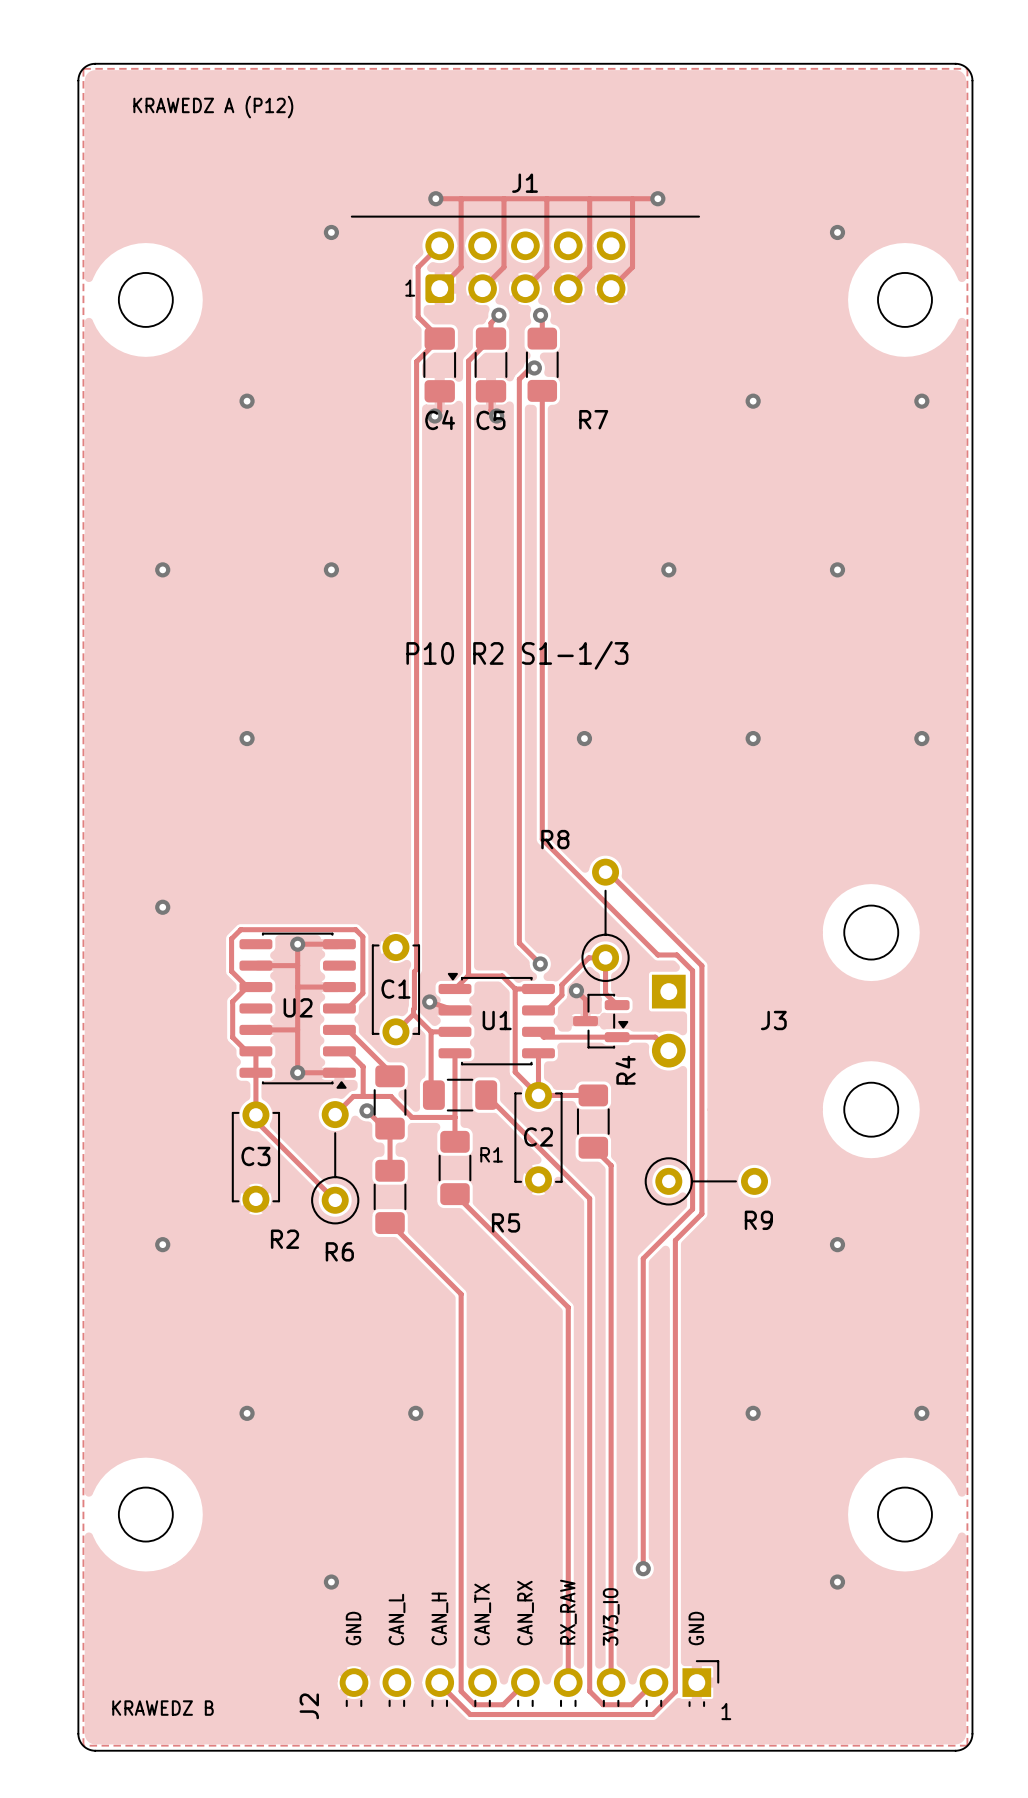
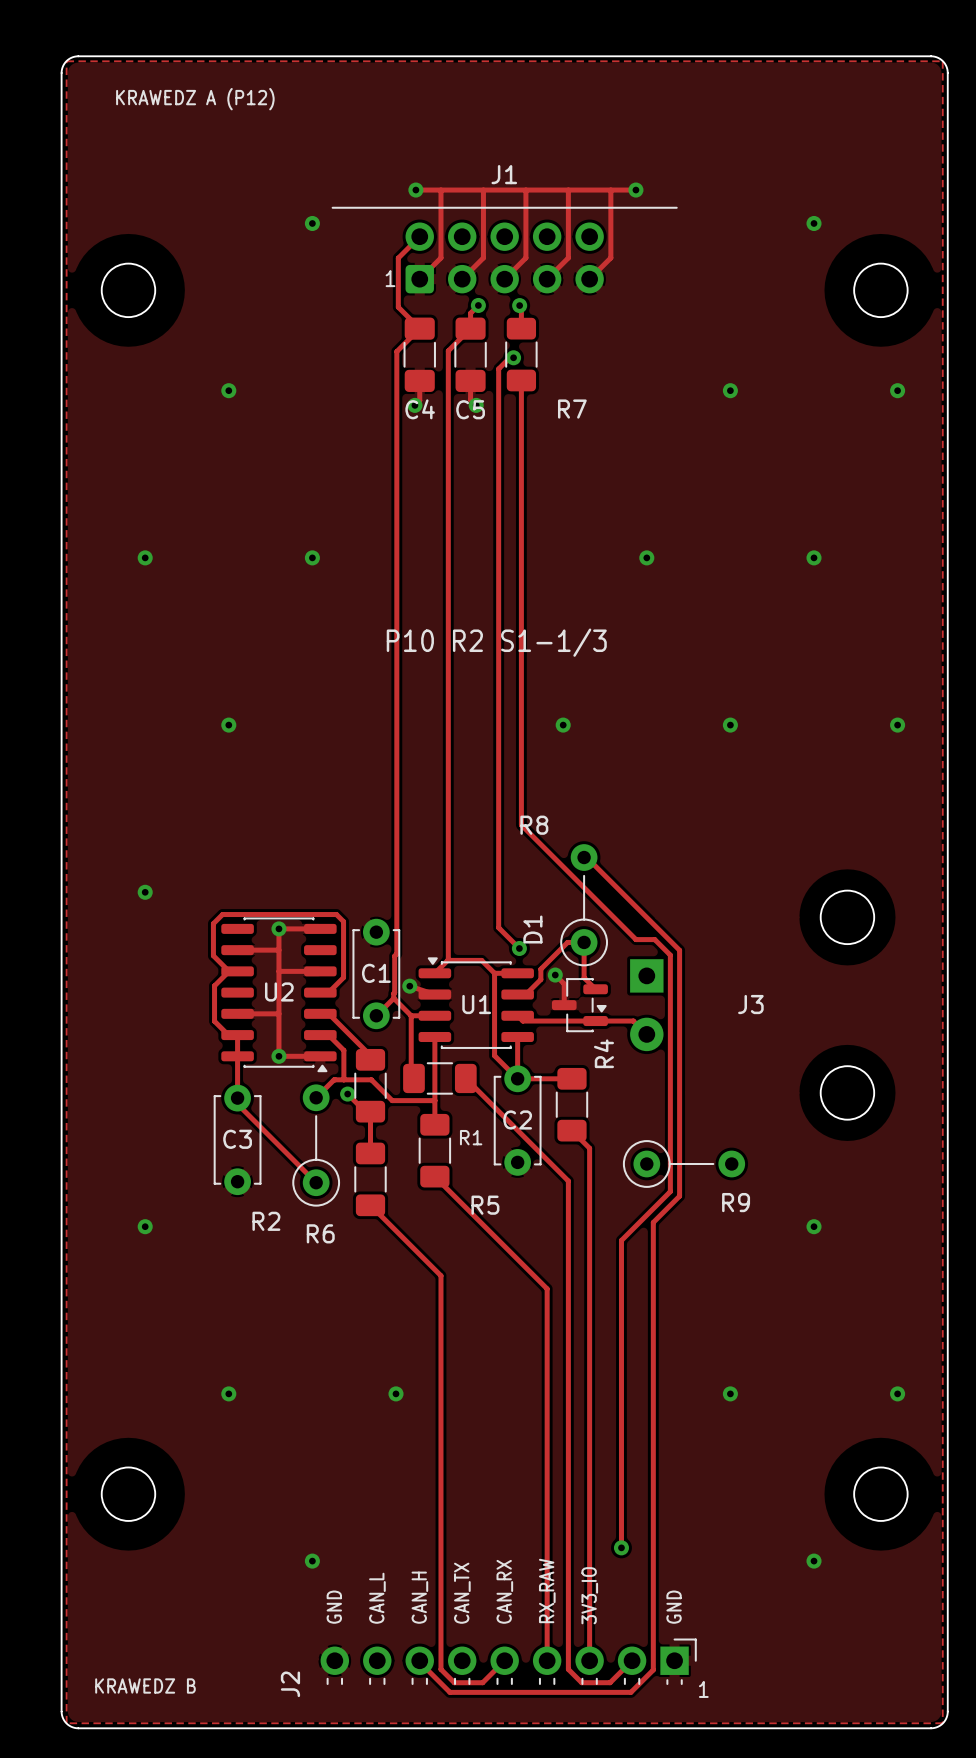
D1 name: none -> D1 (532, 929)

